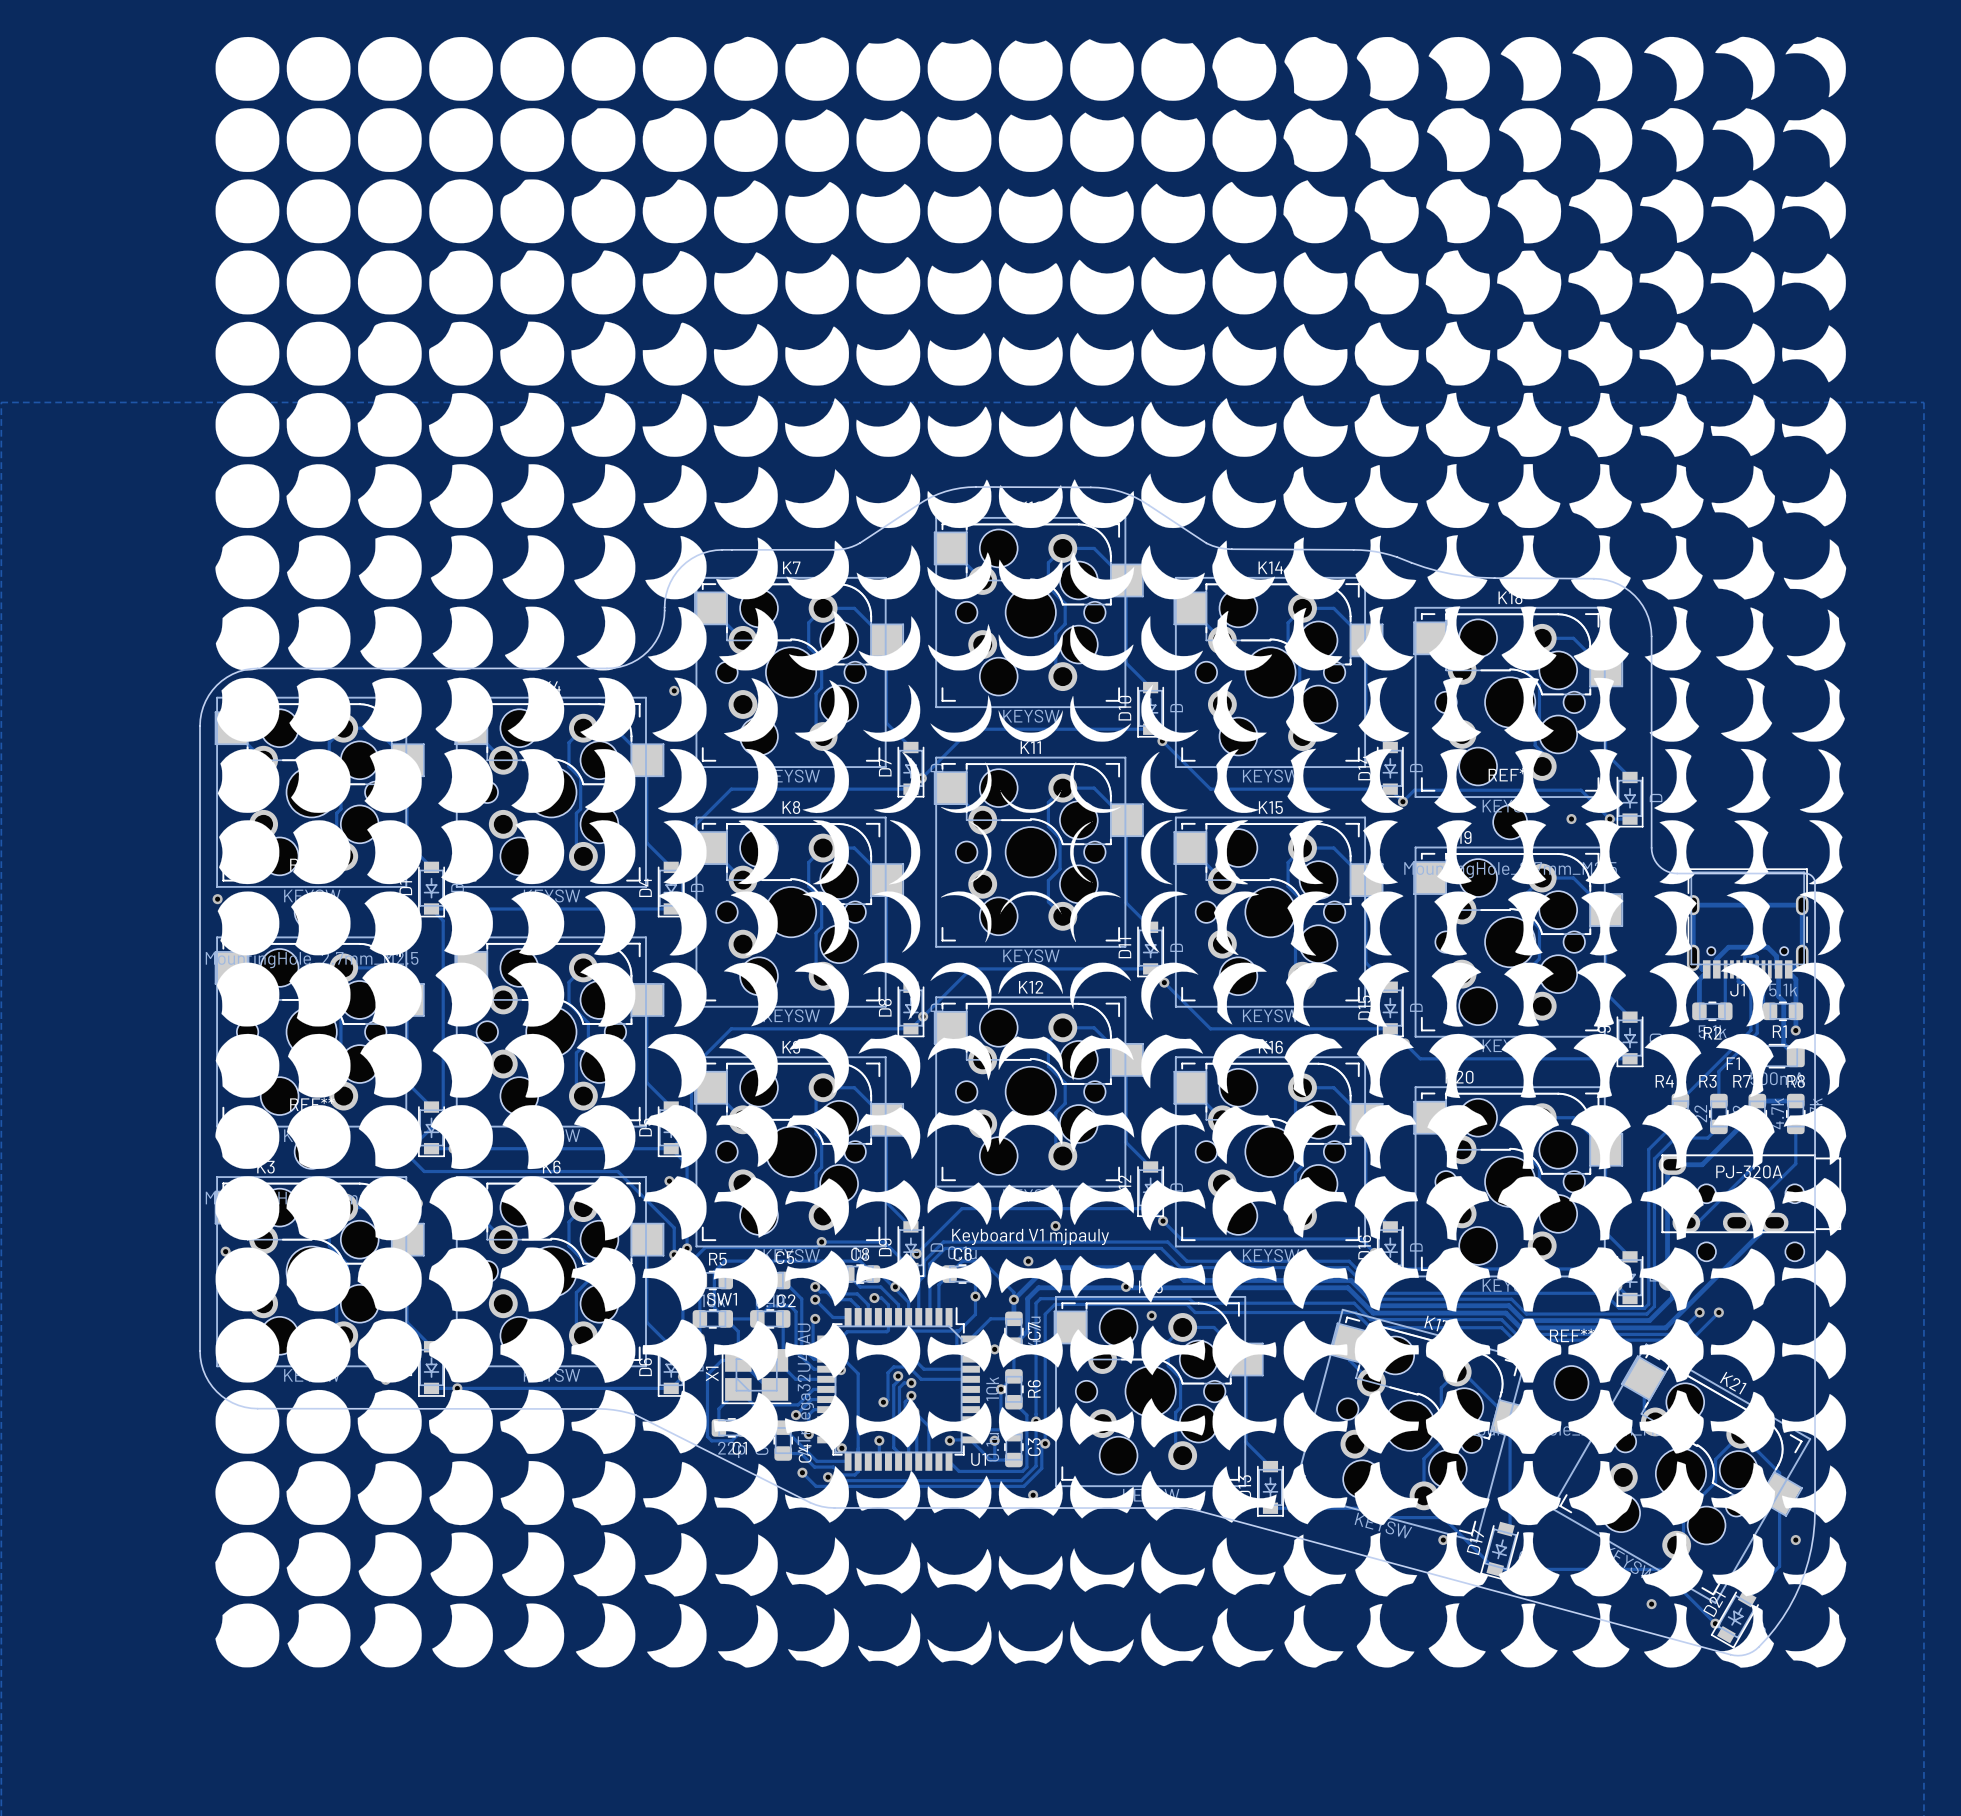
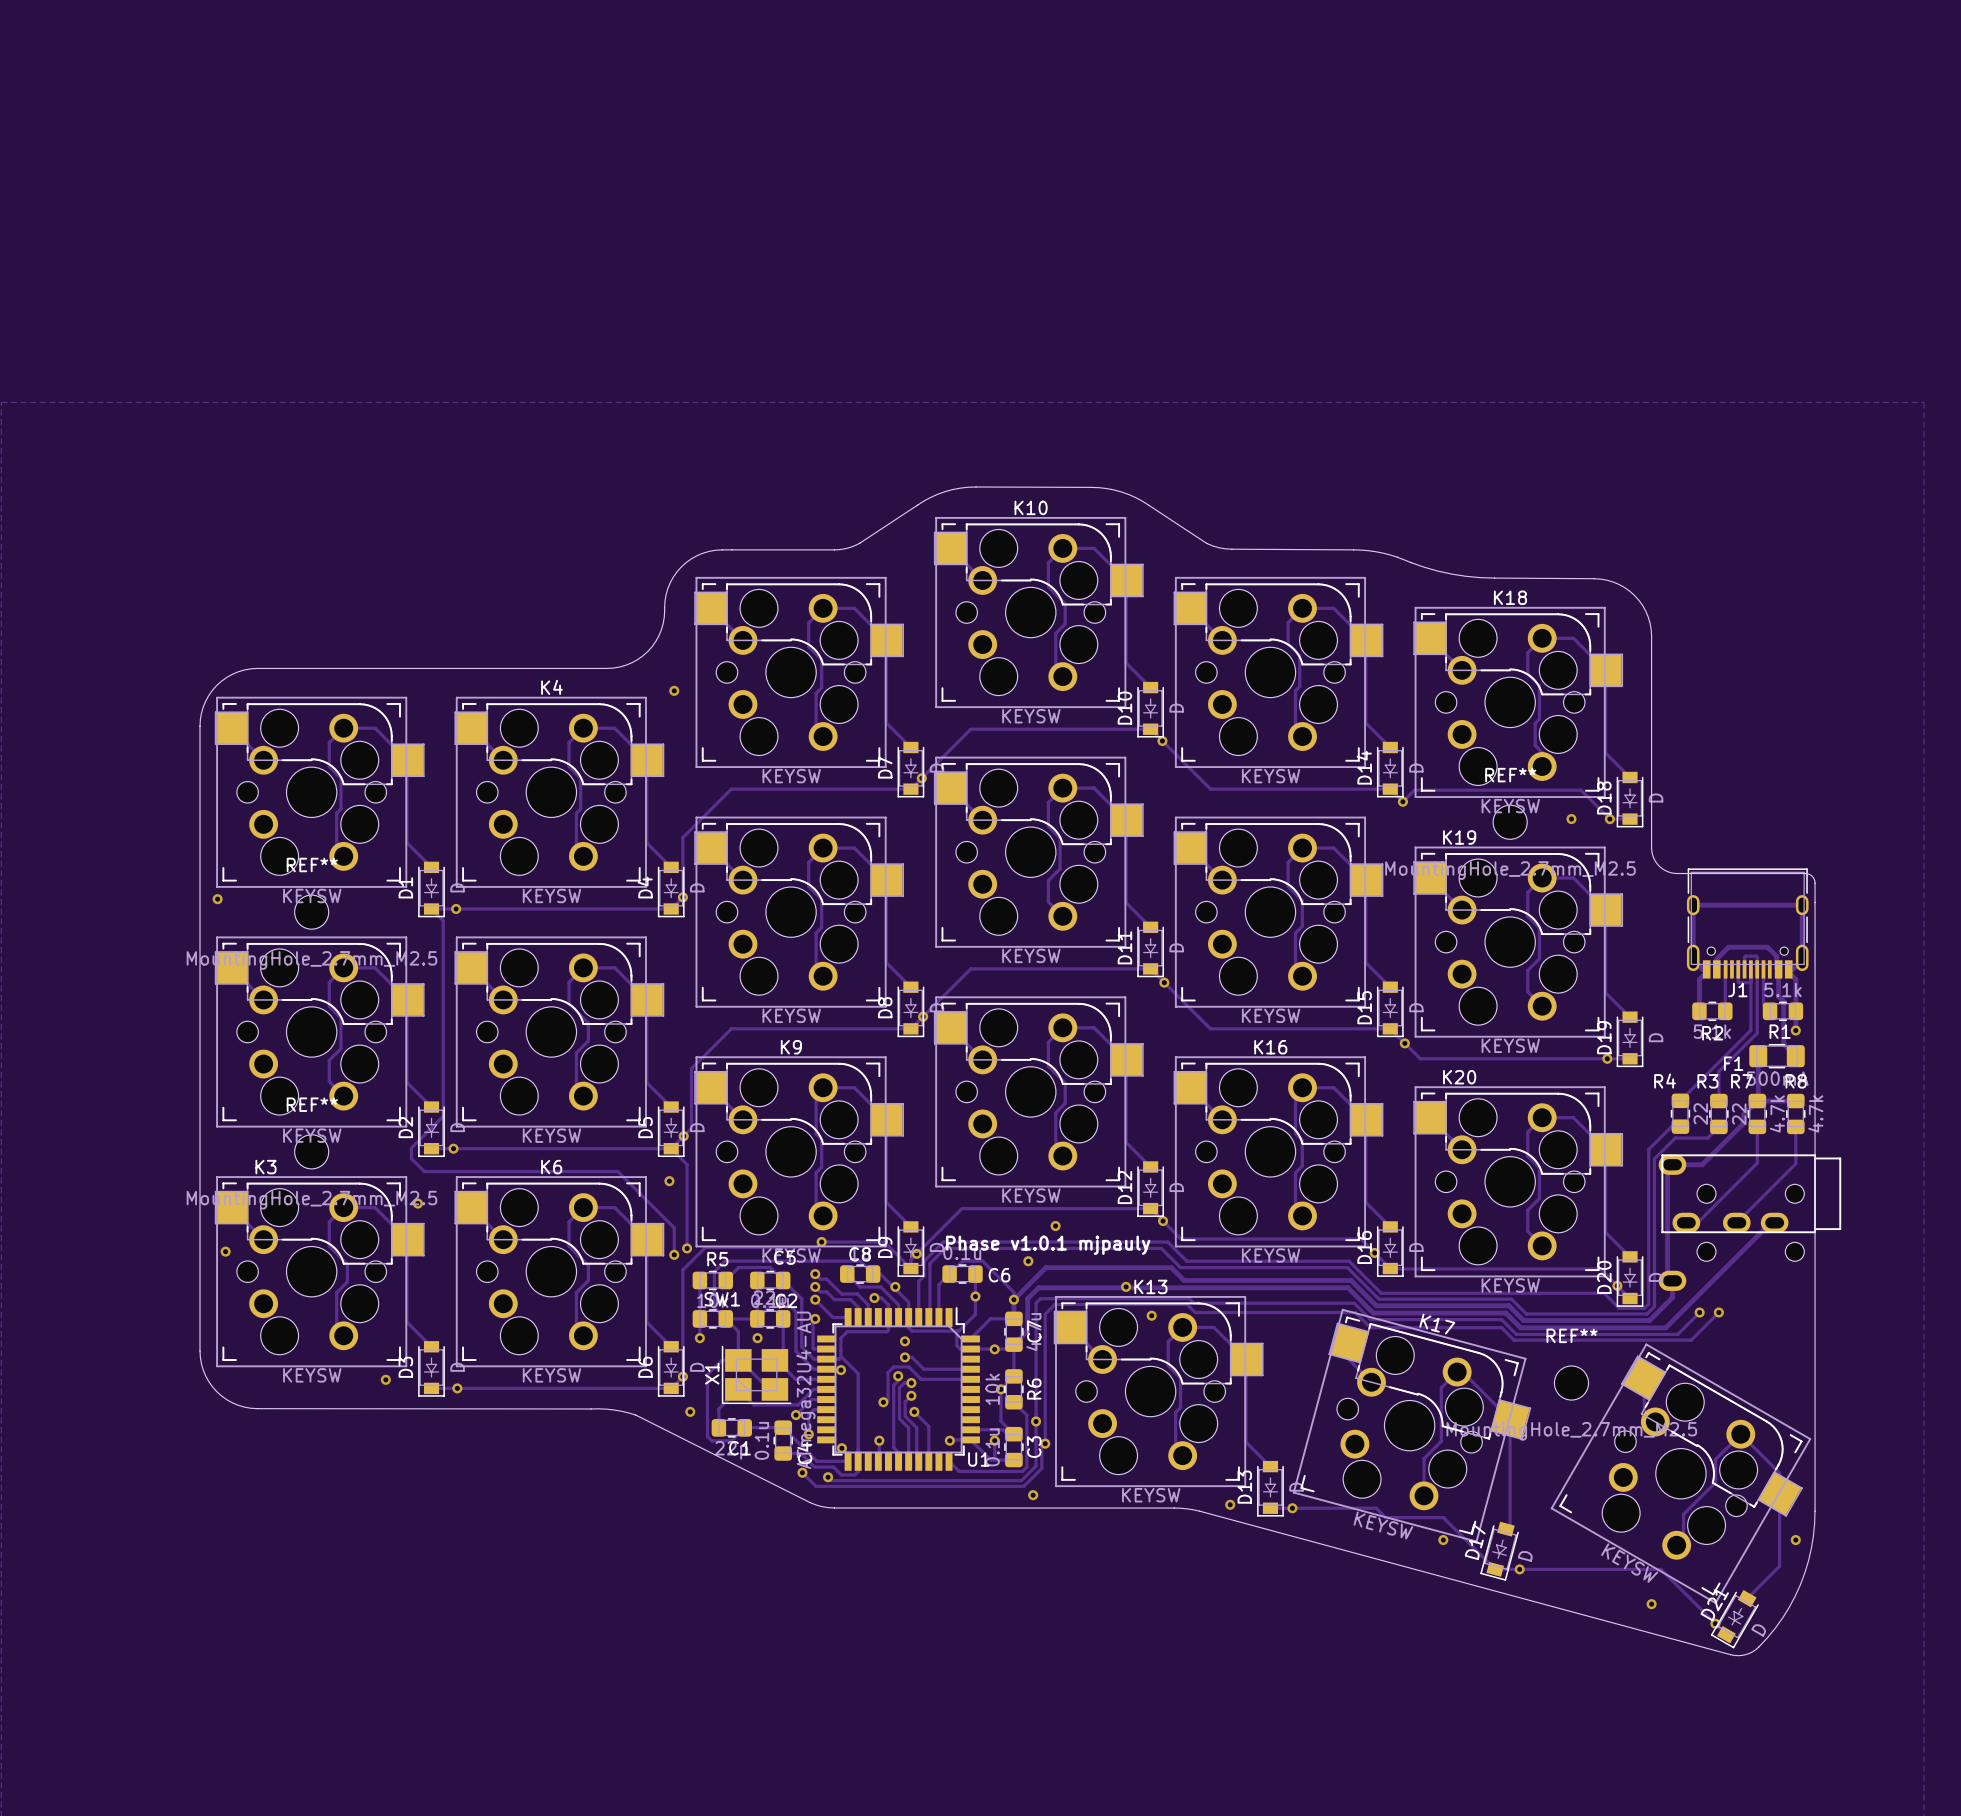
drawing: [215, 36, 1847, 1668] -> none
K7 name: K7 (791, 567) -> none
K14 name: K14 (1270, 567) -> none
K11 name: K11 (1030, 747) -> none
K8 name: K8 (791, 807) -> none
K15 name: K15 (1270, 807) -> none
K12 name: K12 (1031, 987) -> none
part text: PJ-320A (1749, 1171) -> none
text: Keyboard V1 mjpauly (1030, 1236) -> none
text: none -> Phase v1.0.1 mjpauly (1048, 1245)
C6 name position: C6 (962, 1254) -> C6 (999, 1275)
K21 name: K21 (1733, 1383) -> none

